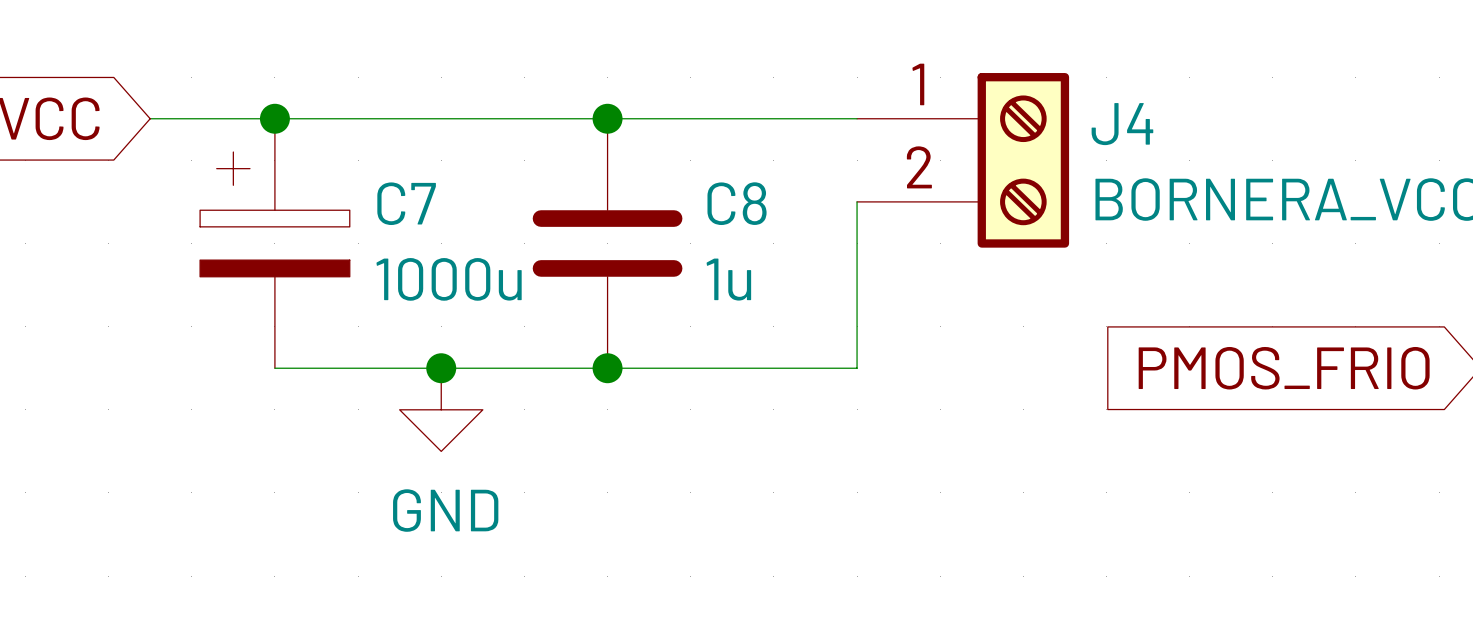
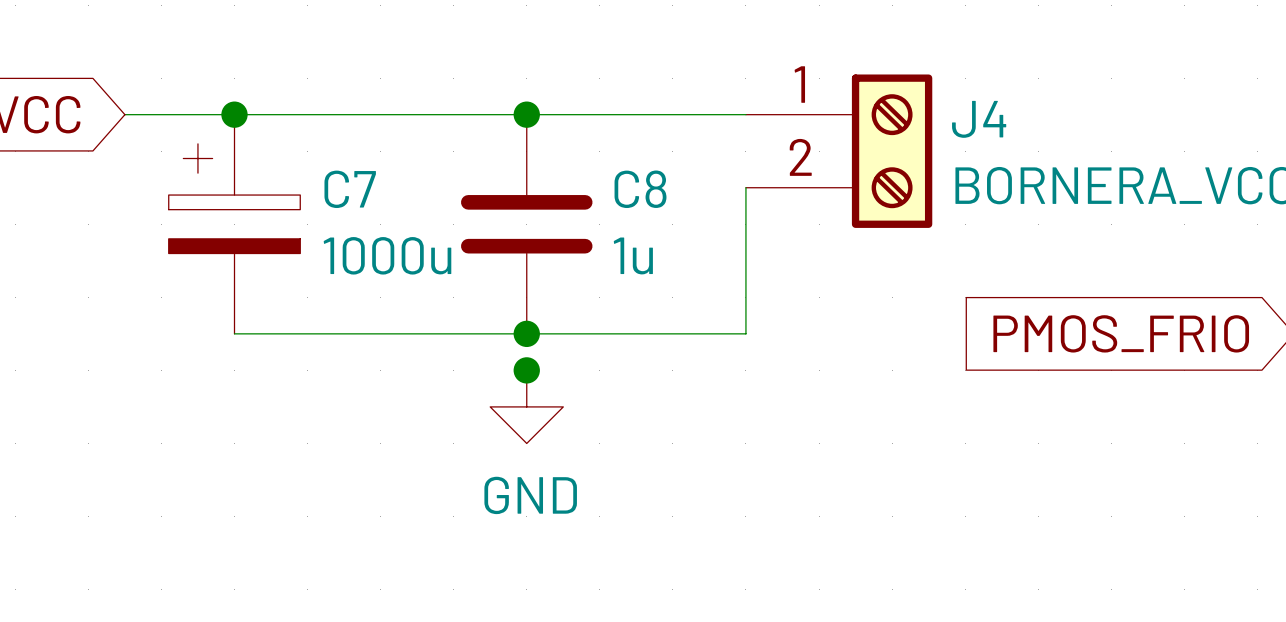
junction position: (441, 368) -> (526, 370)
power symbol position: GND (441, 409) -> GND (526, 406)

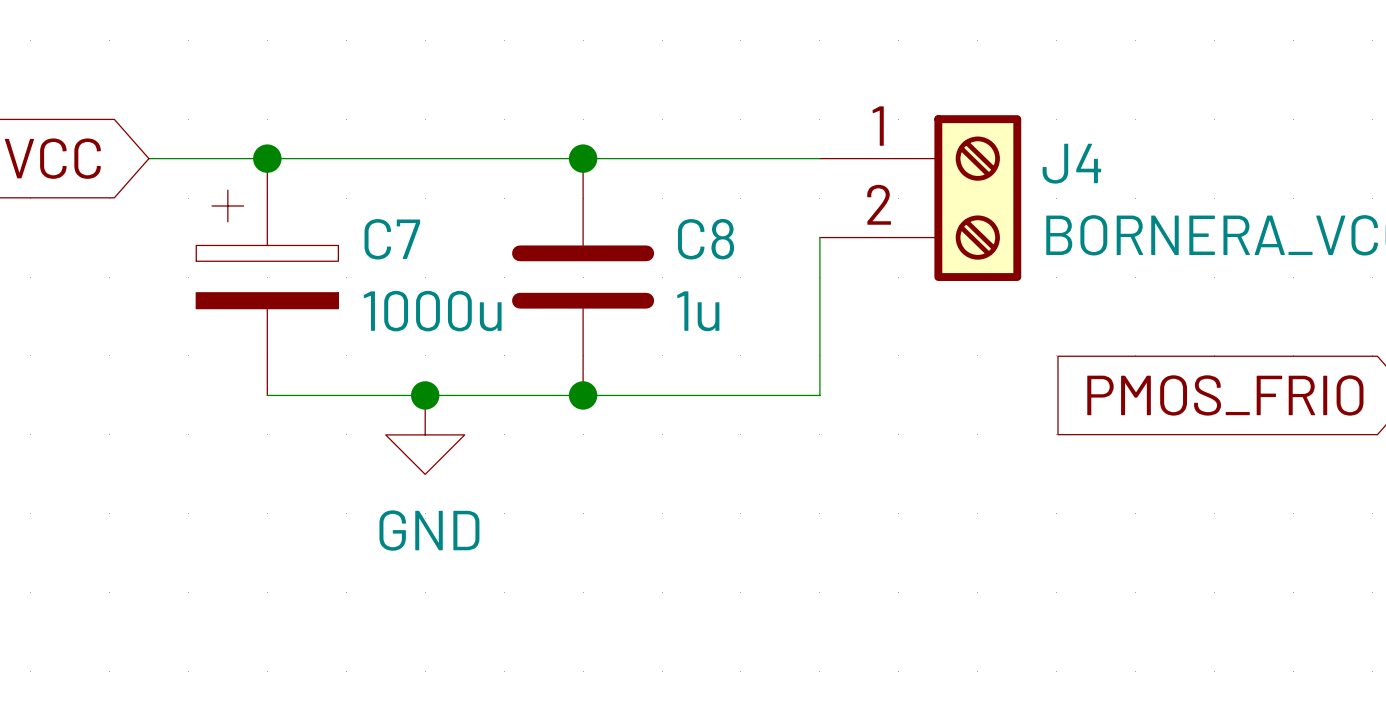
junction position: (526, 370) -> (425, 395)
power symbol position: GND (526, 406) -> GND (425, 434)

